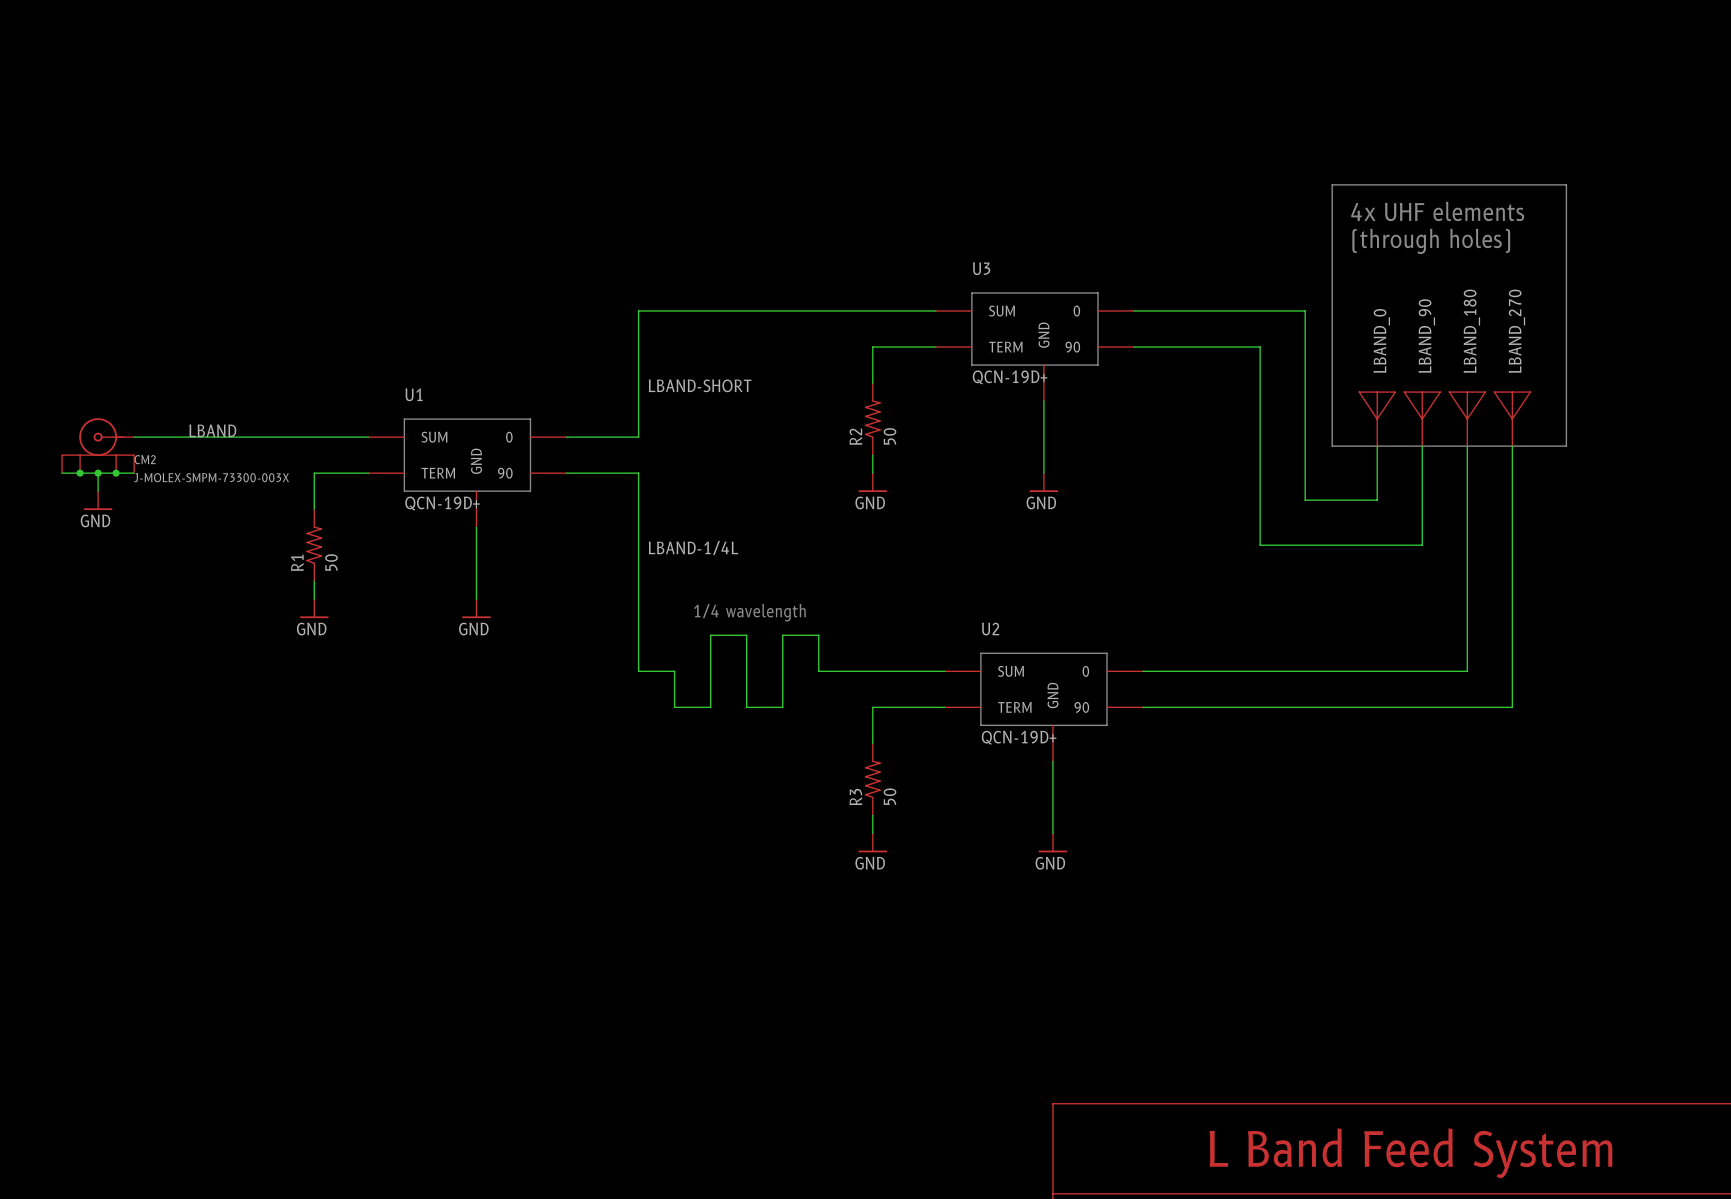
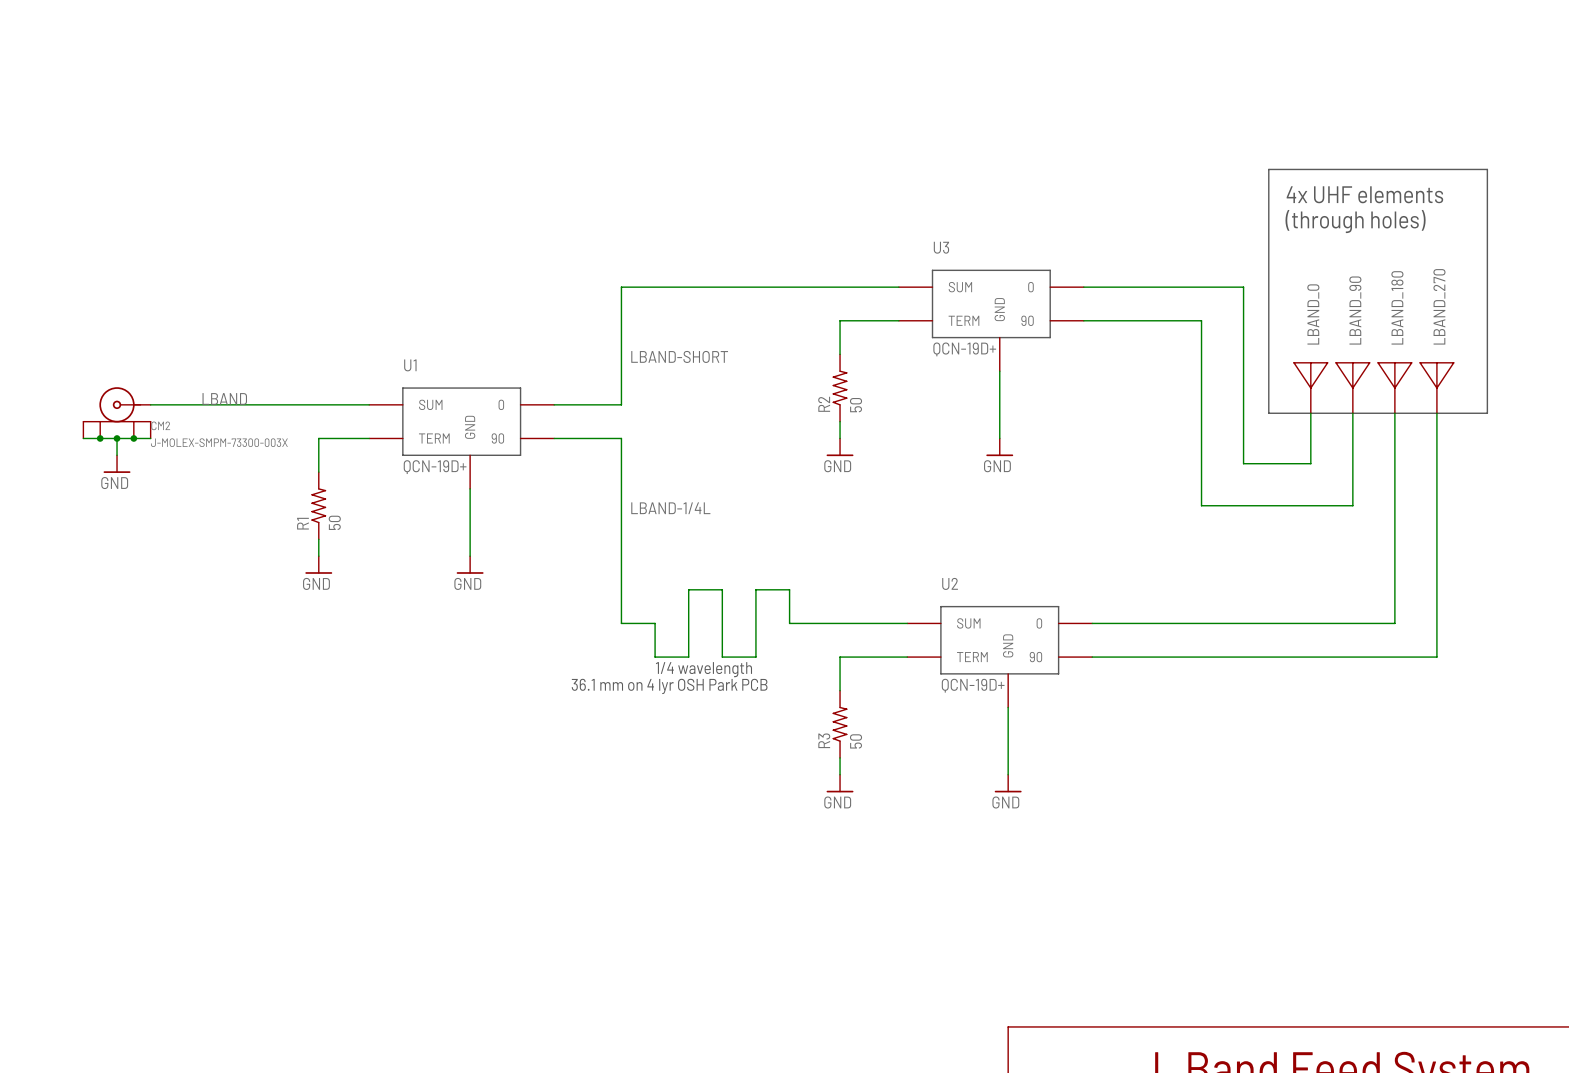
text position: 1/4 wavelength (749, 612) -> 1/4 wavelength (703, 669)
text: none -> 36.1 mm on 4 lyr OSH Park PCB (669, 686)

